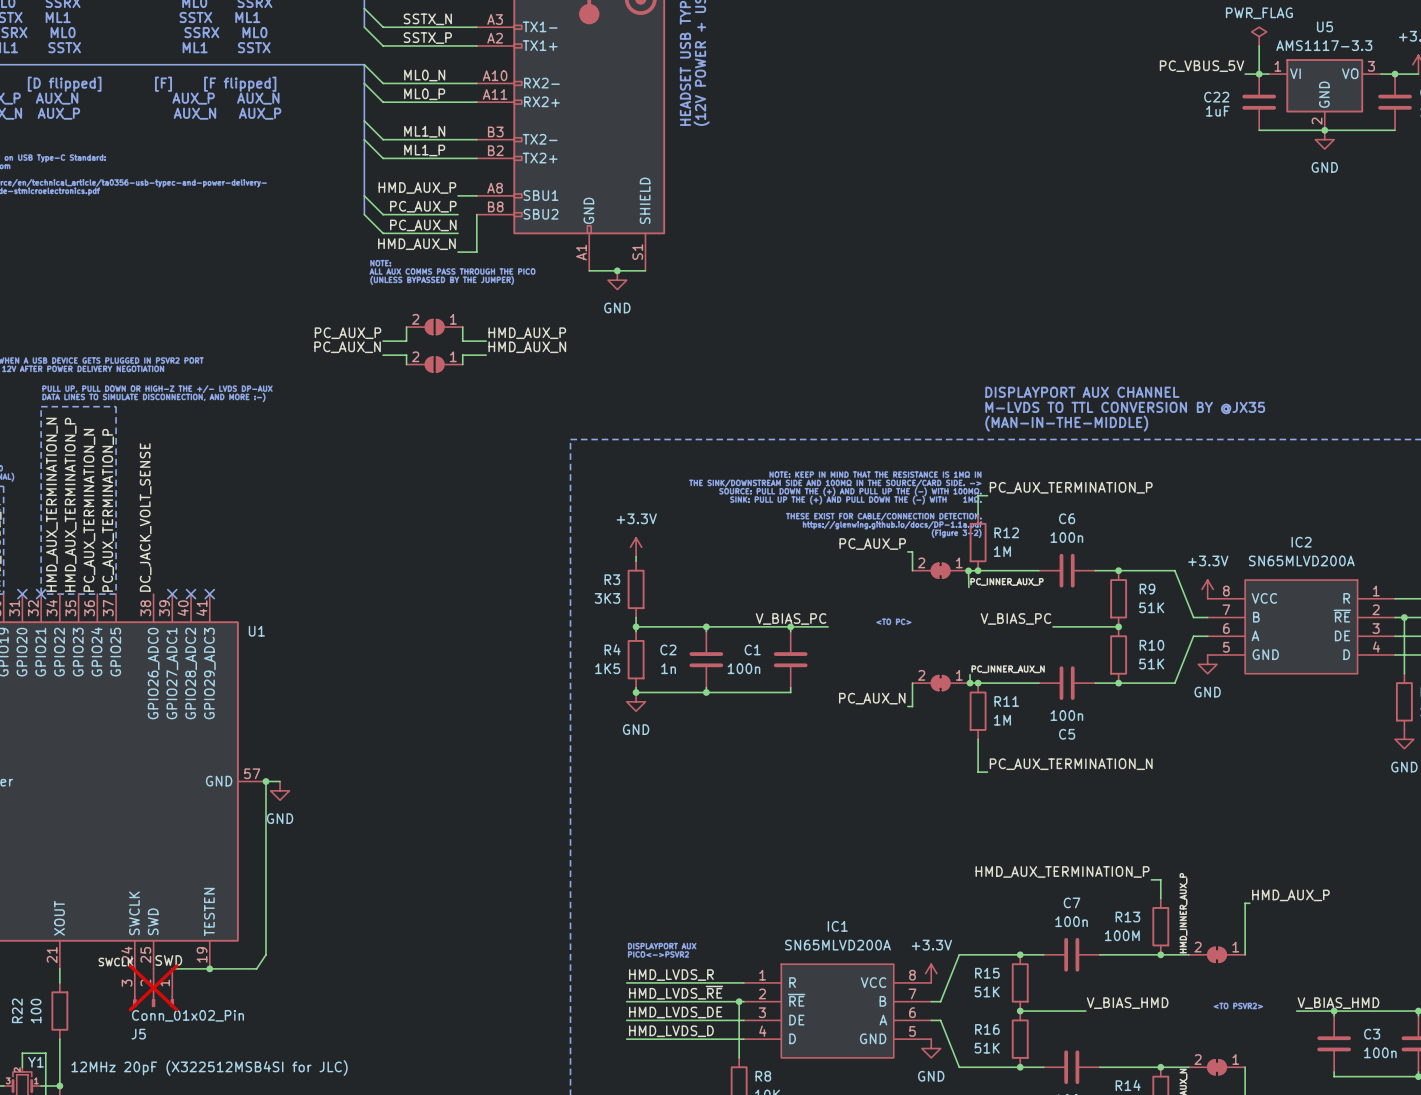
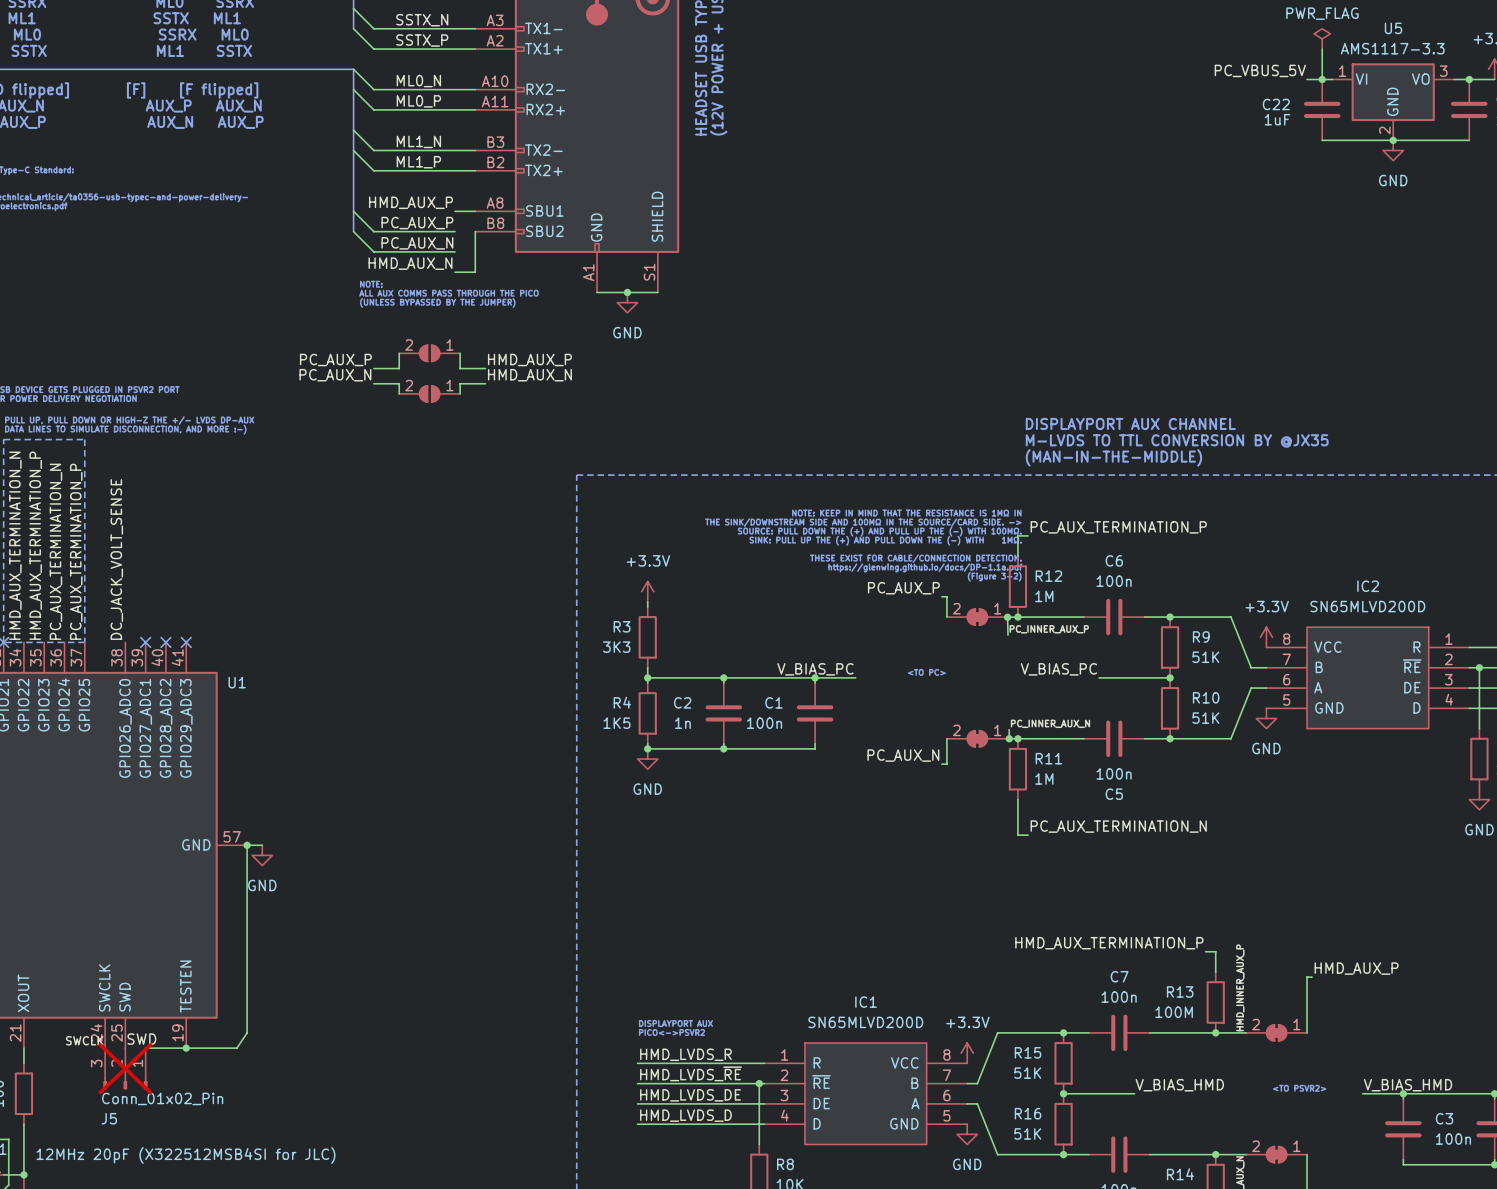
IC2 value: SN65MLVD200A (1301, 560) -> SN65MLVD200D (1367, 606)
IC1 value: SN65MLVD200A (837, 945) -> SN65MLVD200D (865, 1022)

